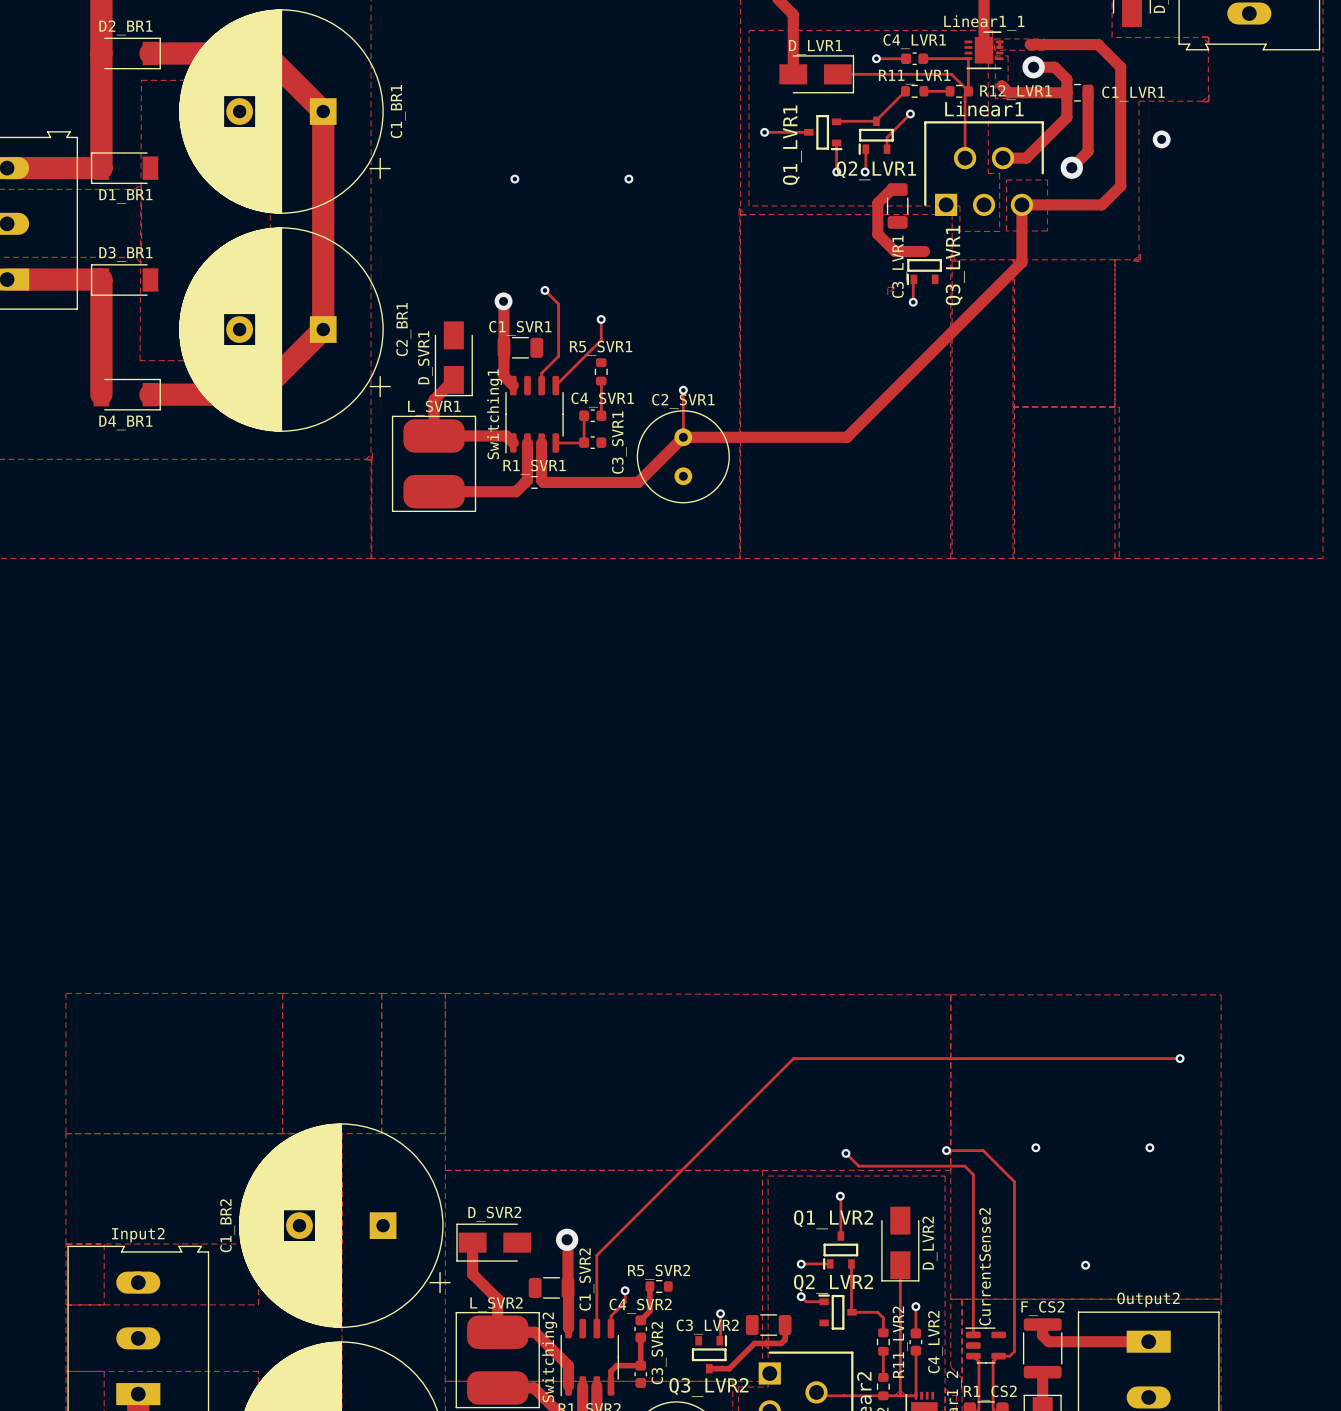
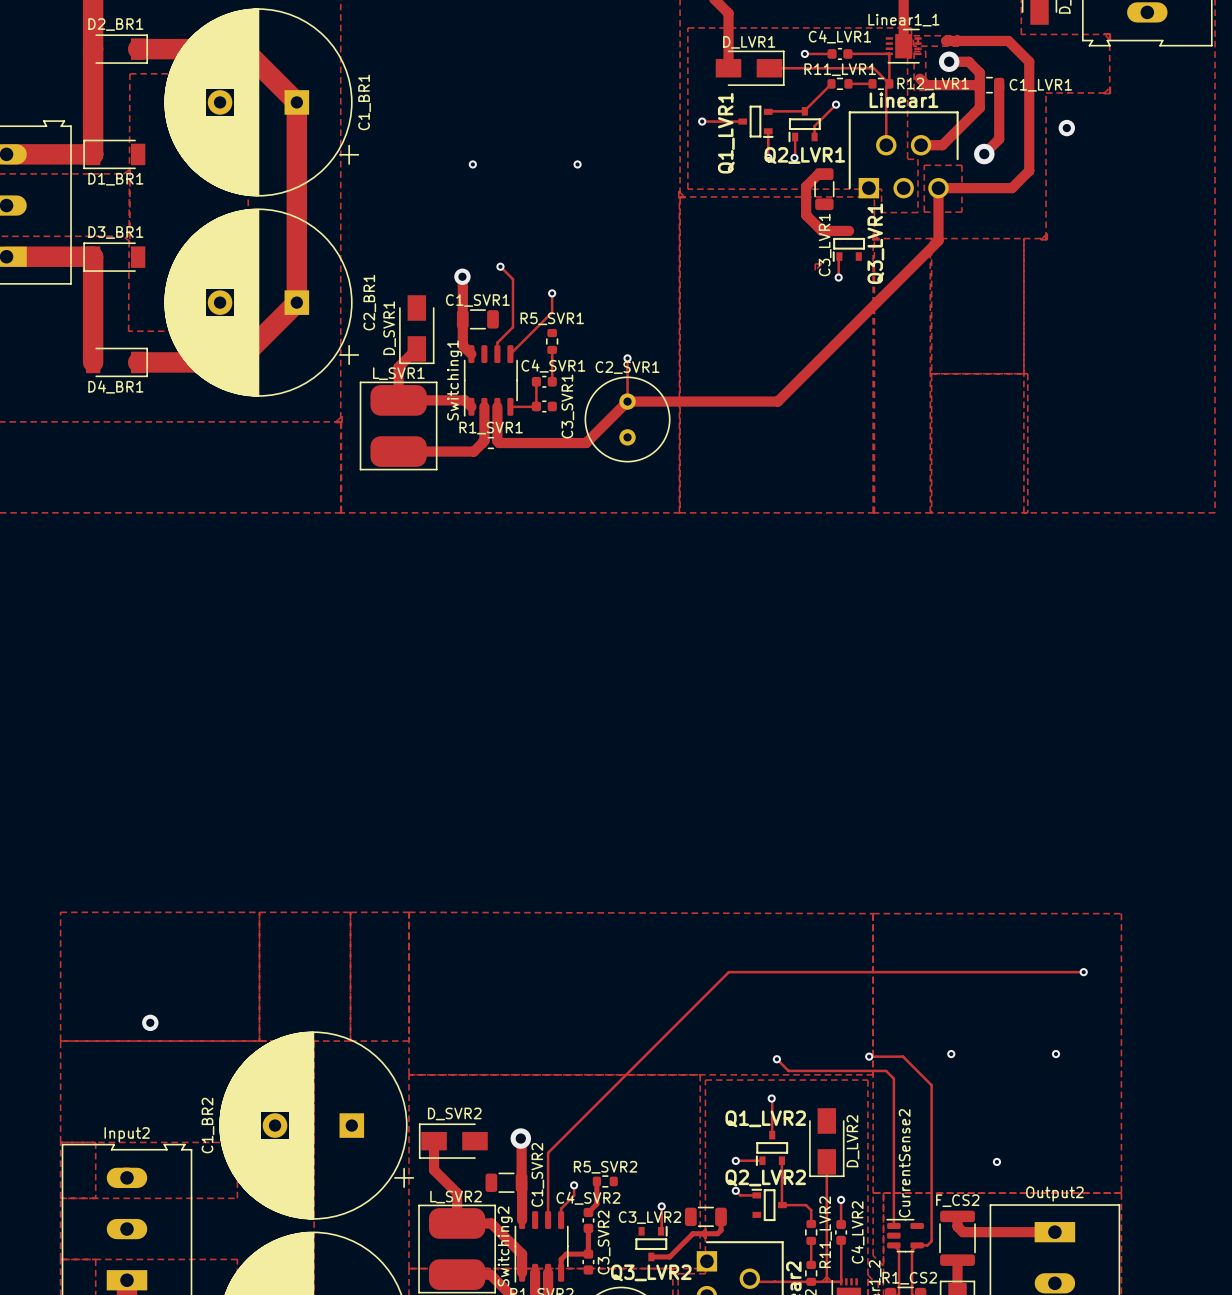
via: none -> (150, 1022)

